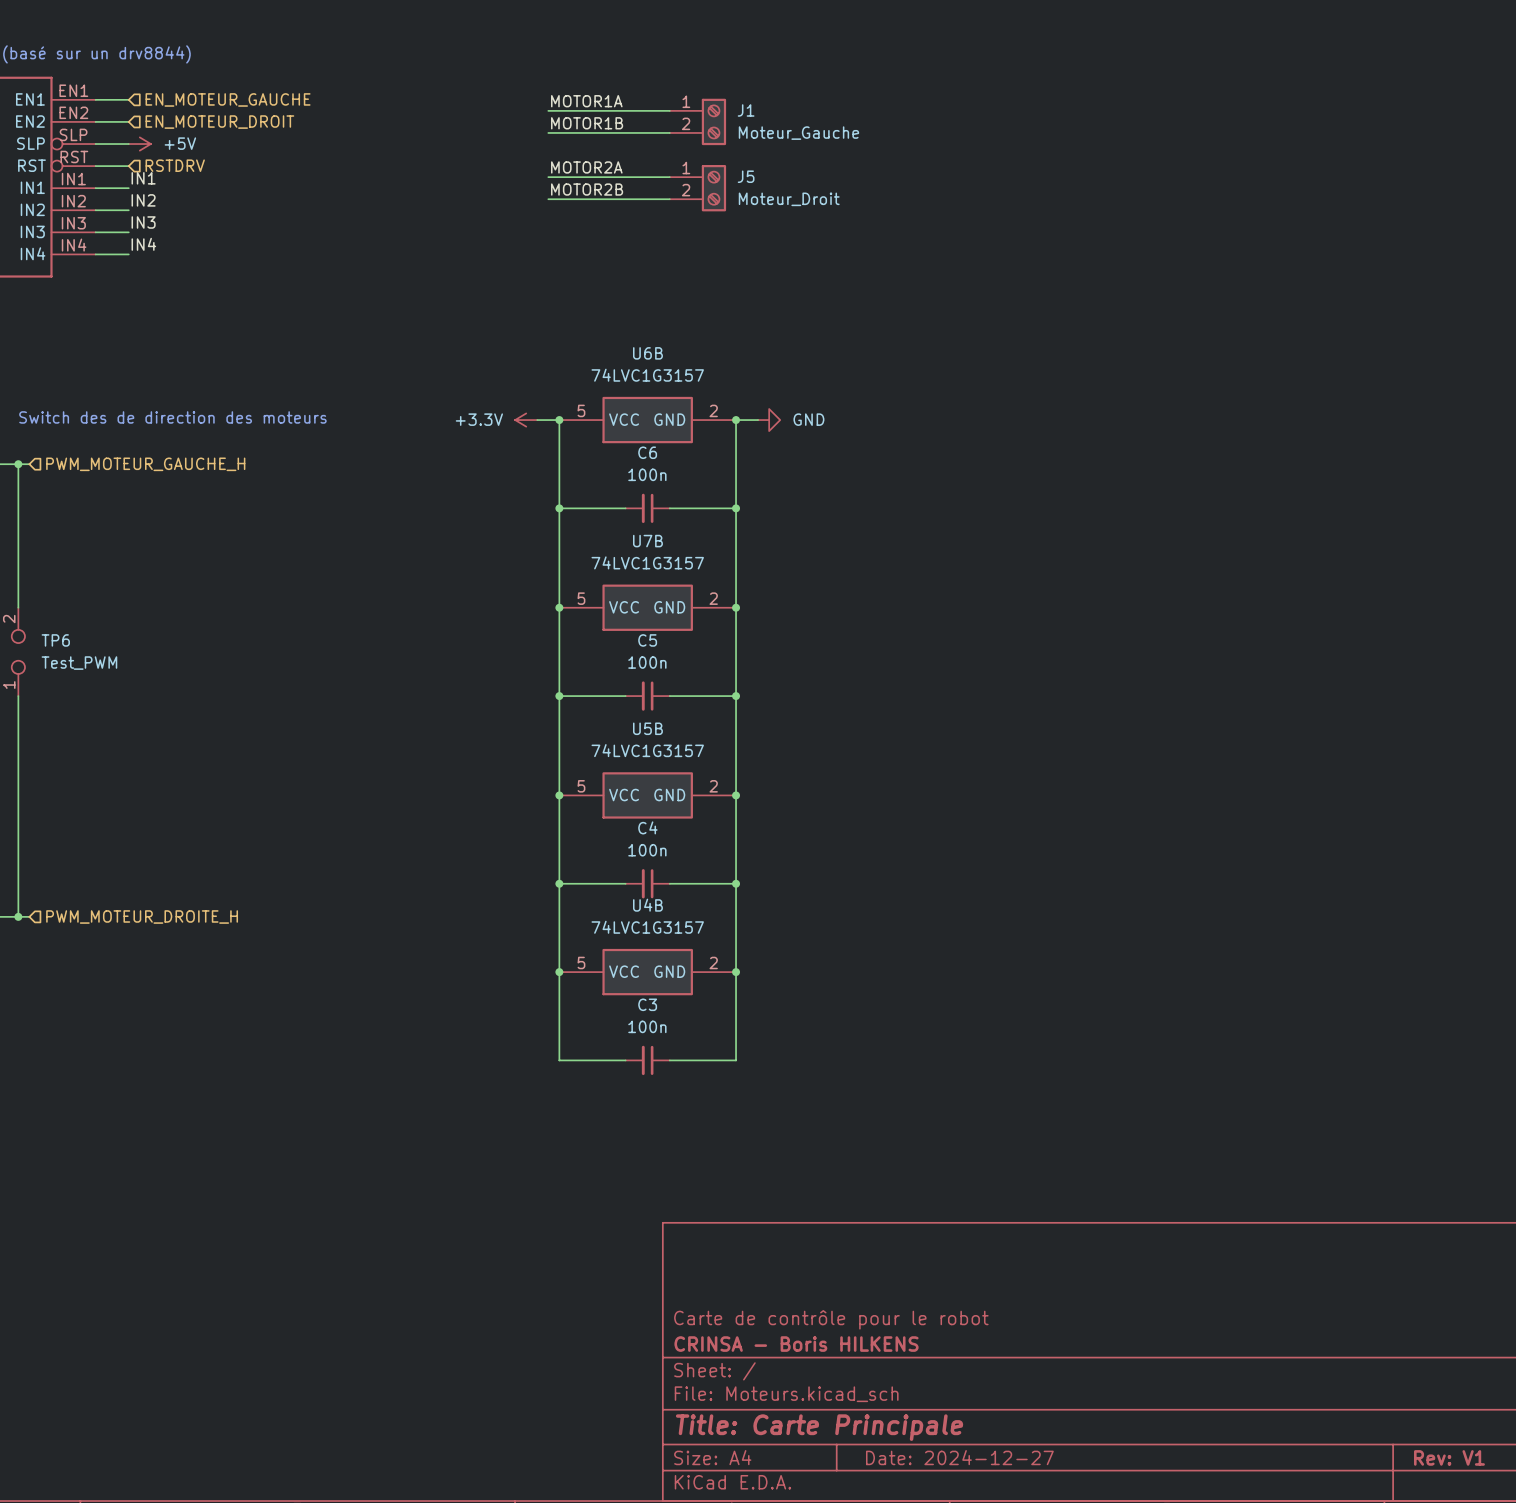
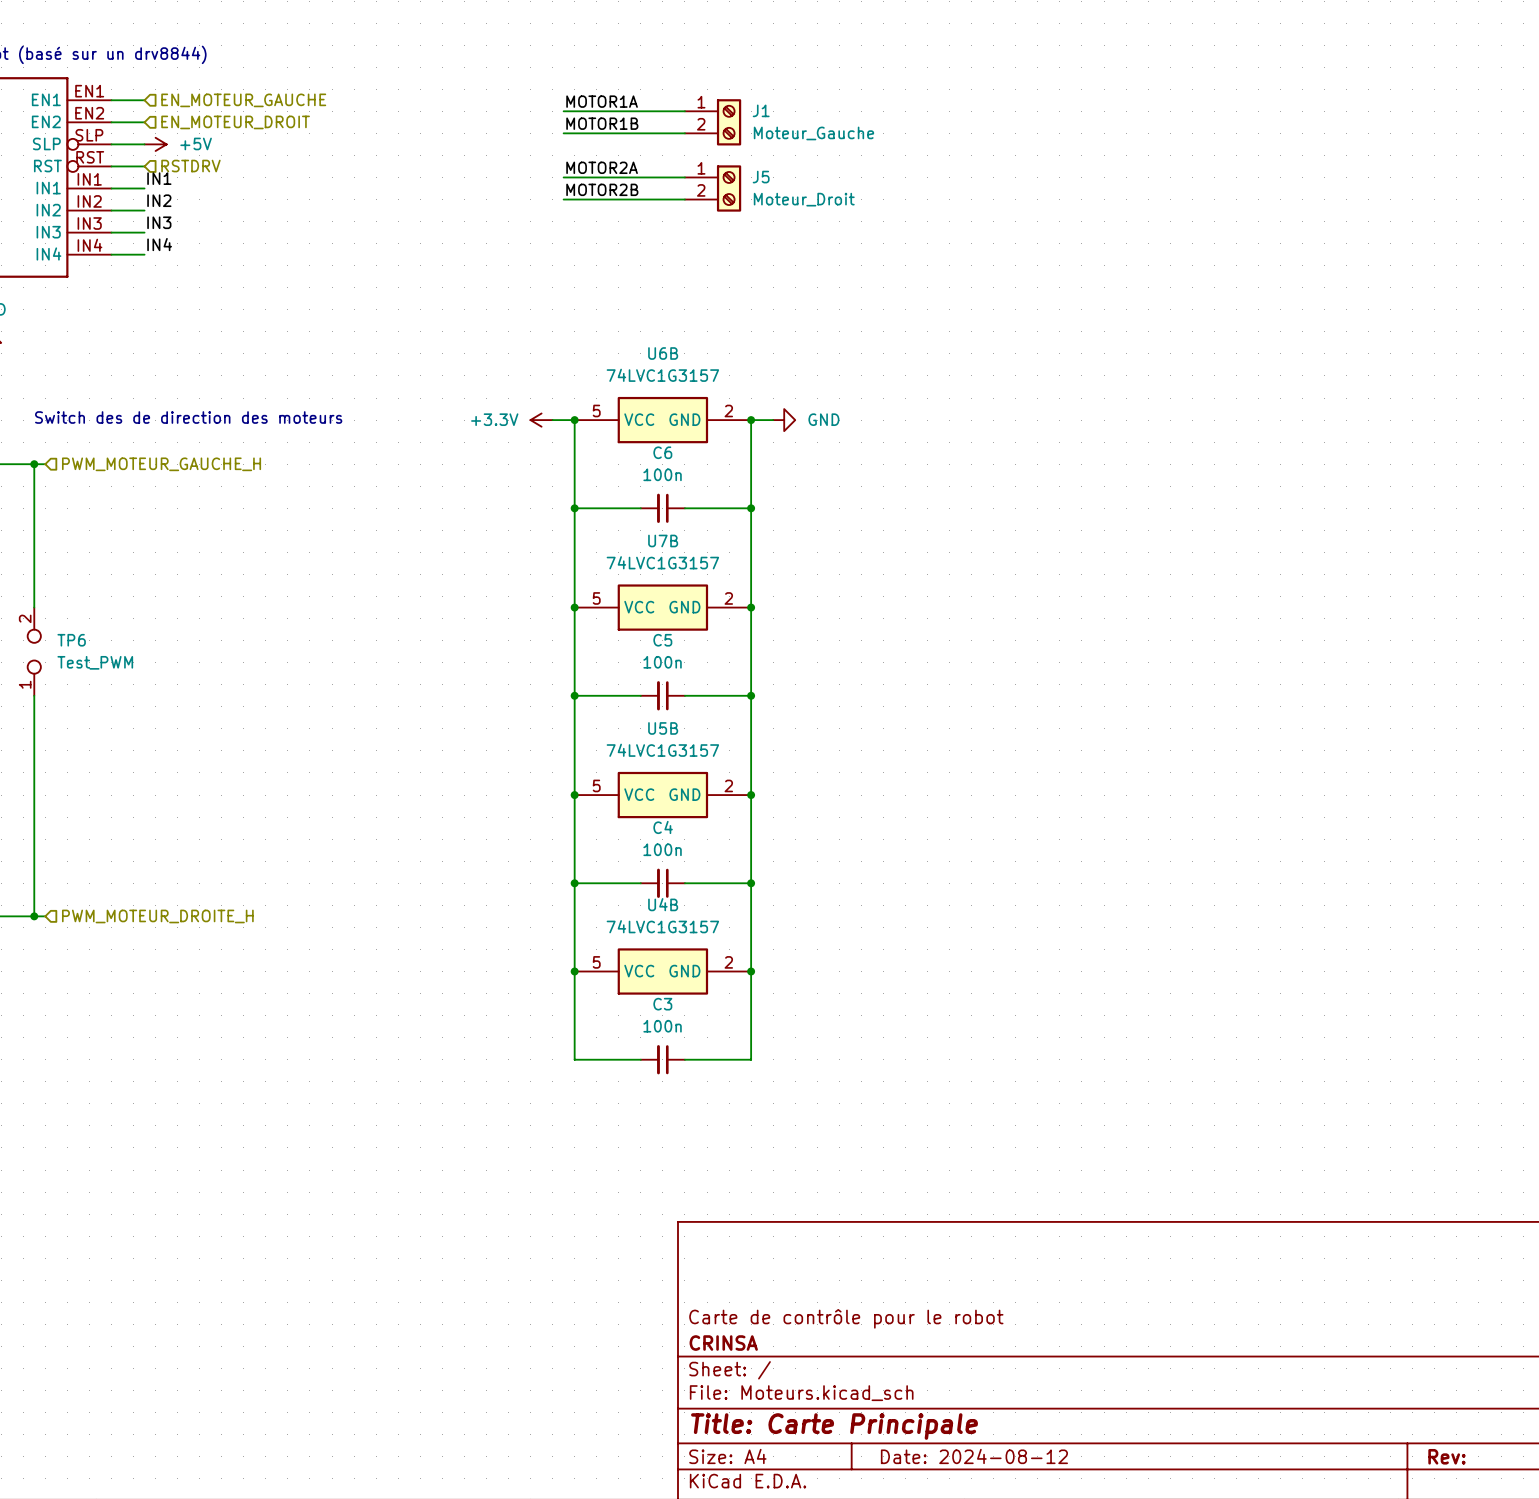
title block: CRINSA - Boris HILKENS (796, 1344) -> CRINSA (723, 1343)
title block: Date: 2024-12-27 (959, 1457) -> Date: 2024-08-12 (974, 1456)
title block: Rev: V1 (1449, 1457) -> Rev: (1446, 1456)

